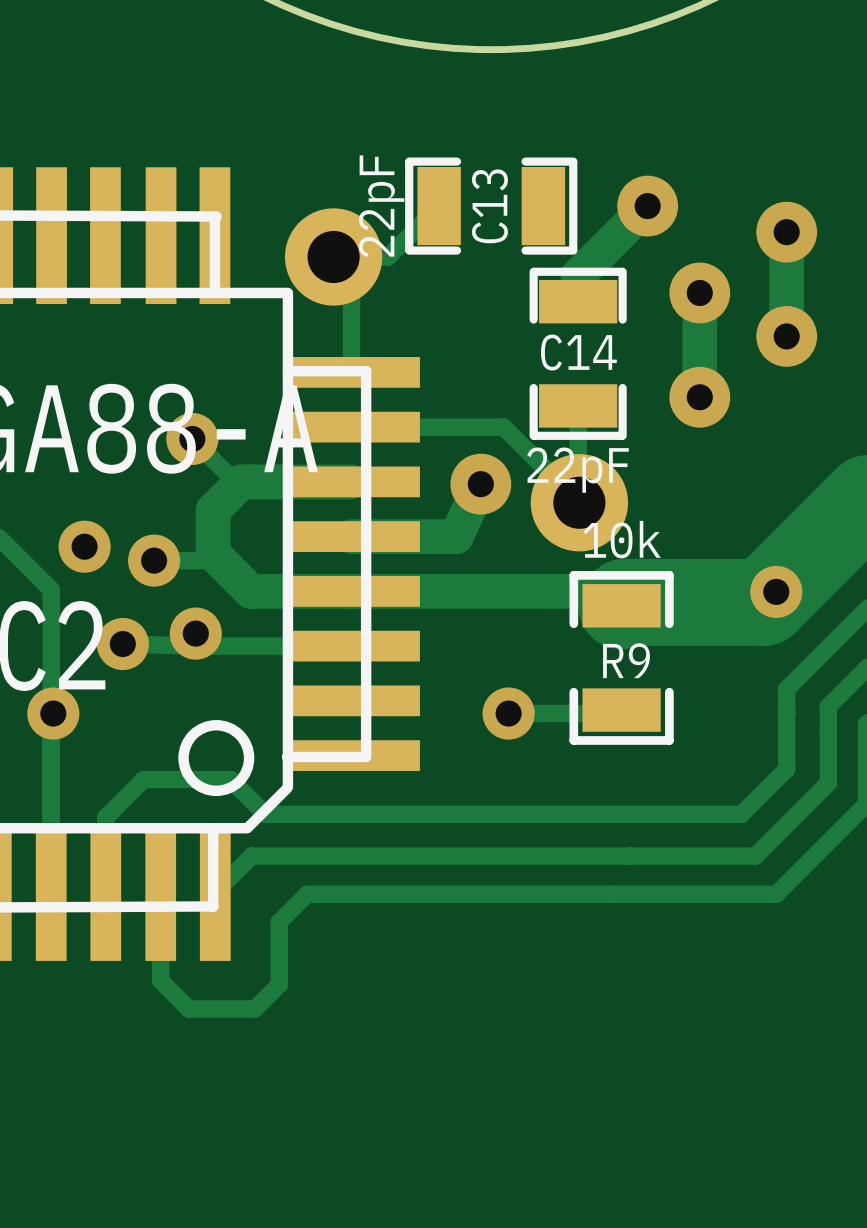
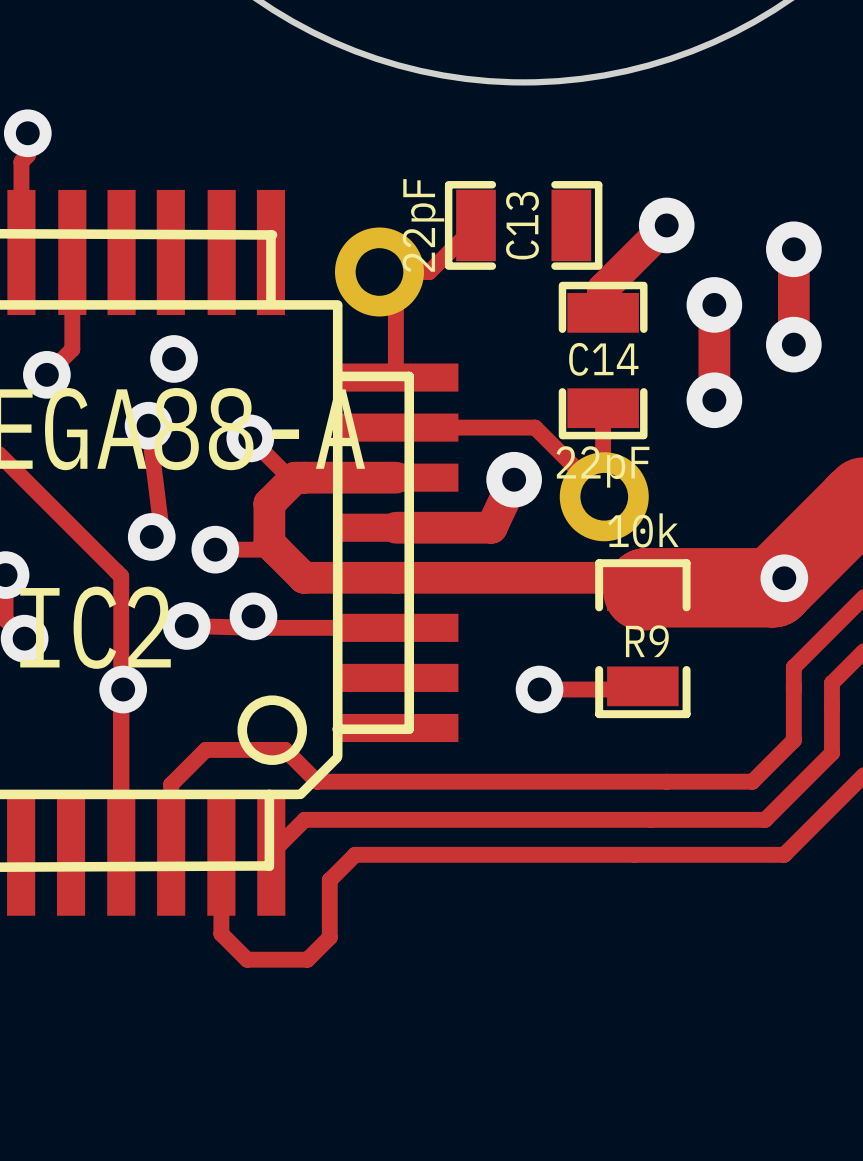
via: none -> (174, 358)
track: none -> (148, 425) (161, 527)
via: none -> (148, 425)

